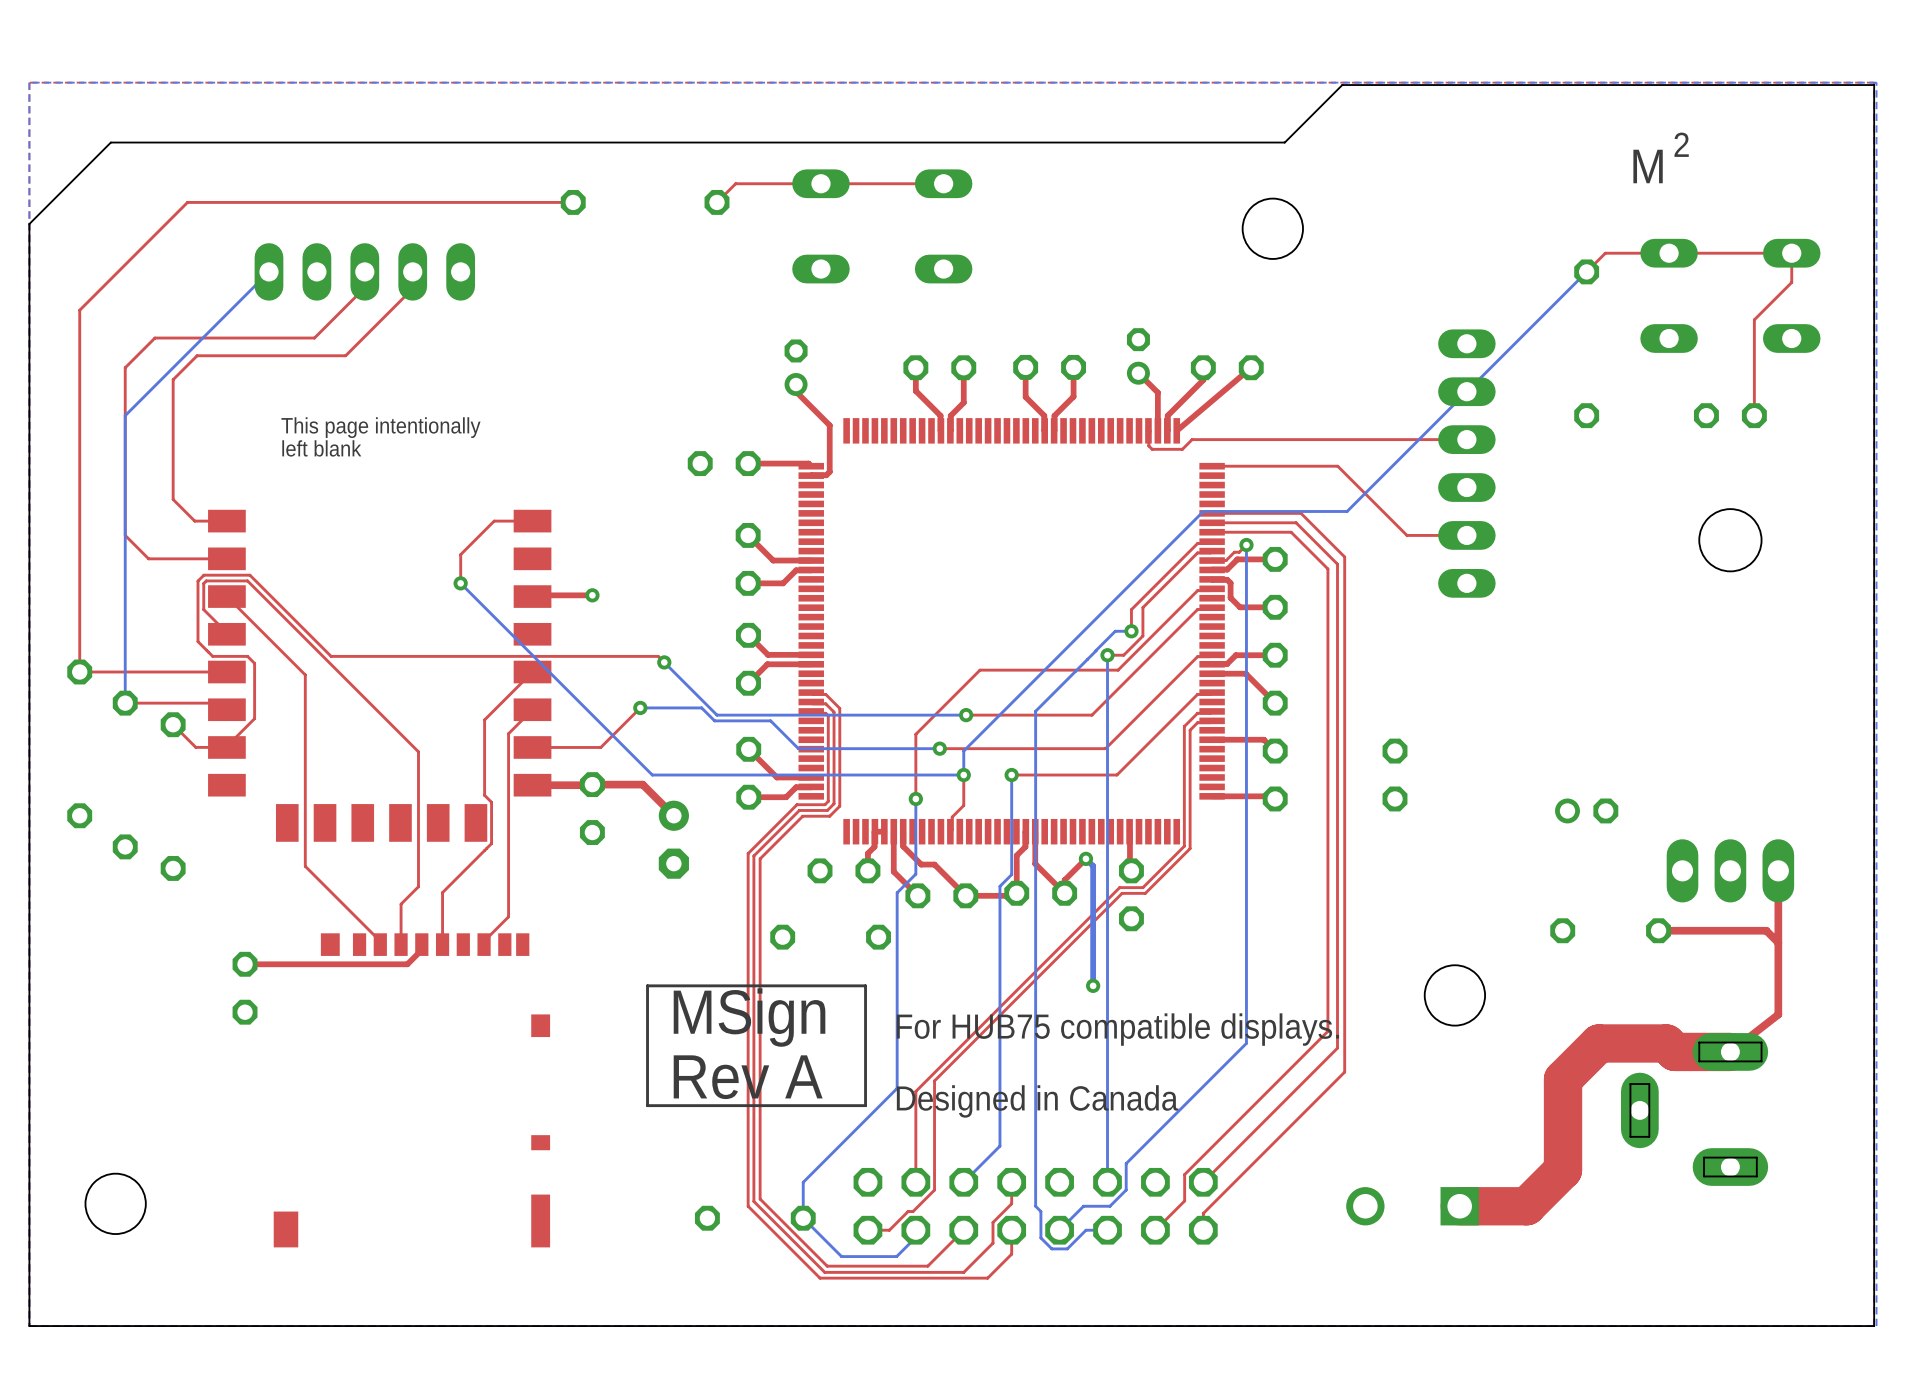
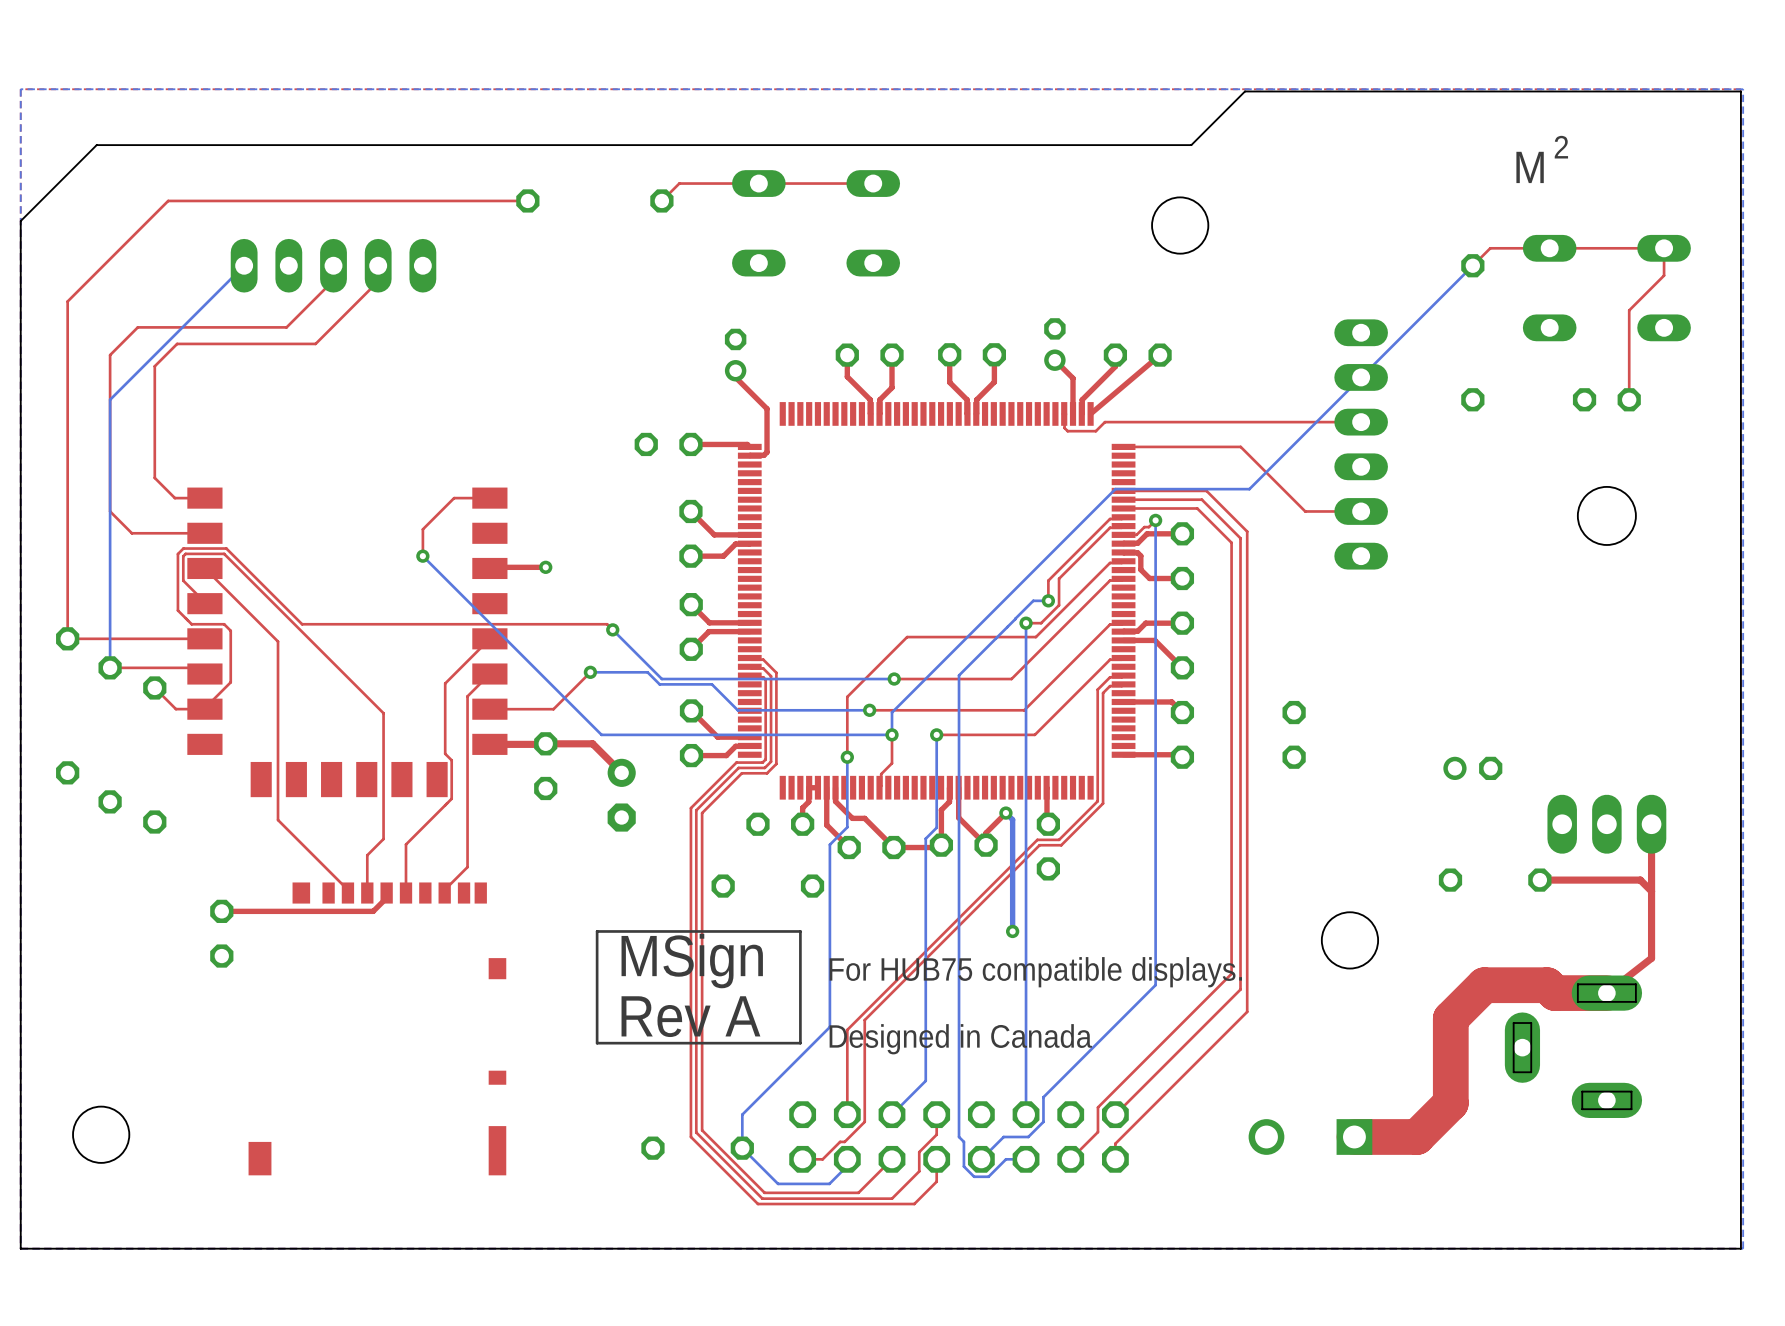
text: This page intentionally (380, 427) -> none
text: left blank (321, 448) -> none

